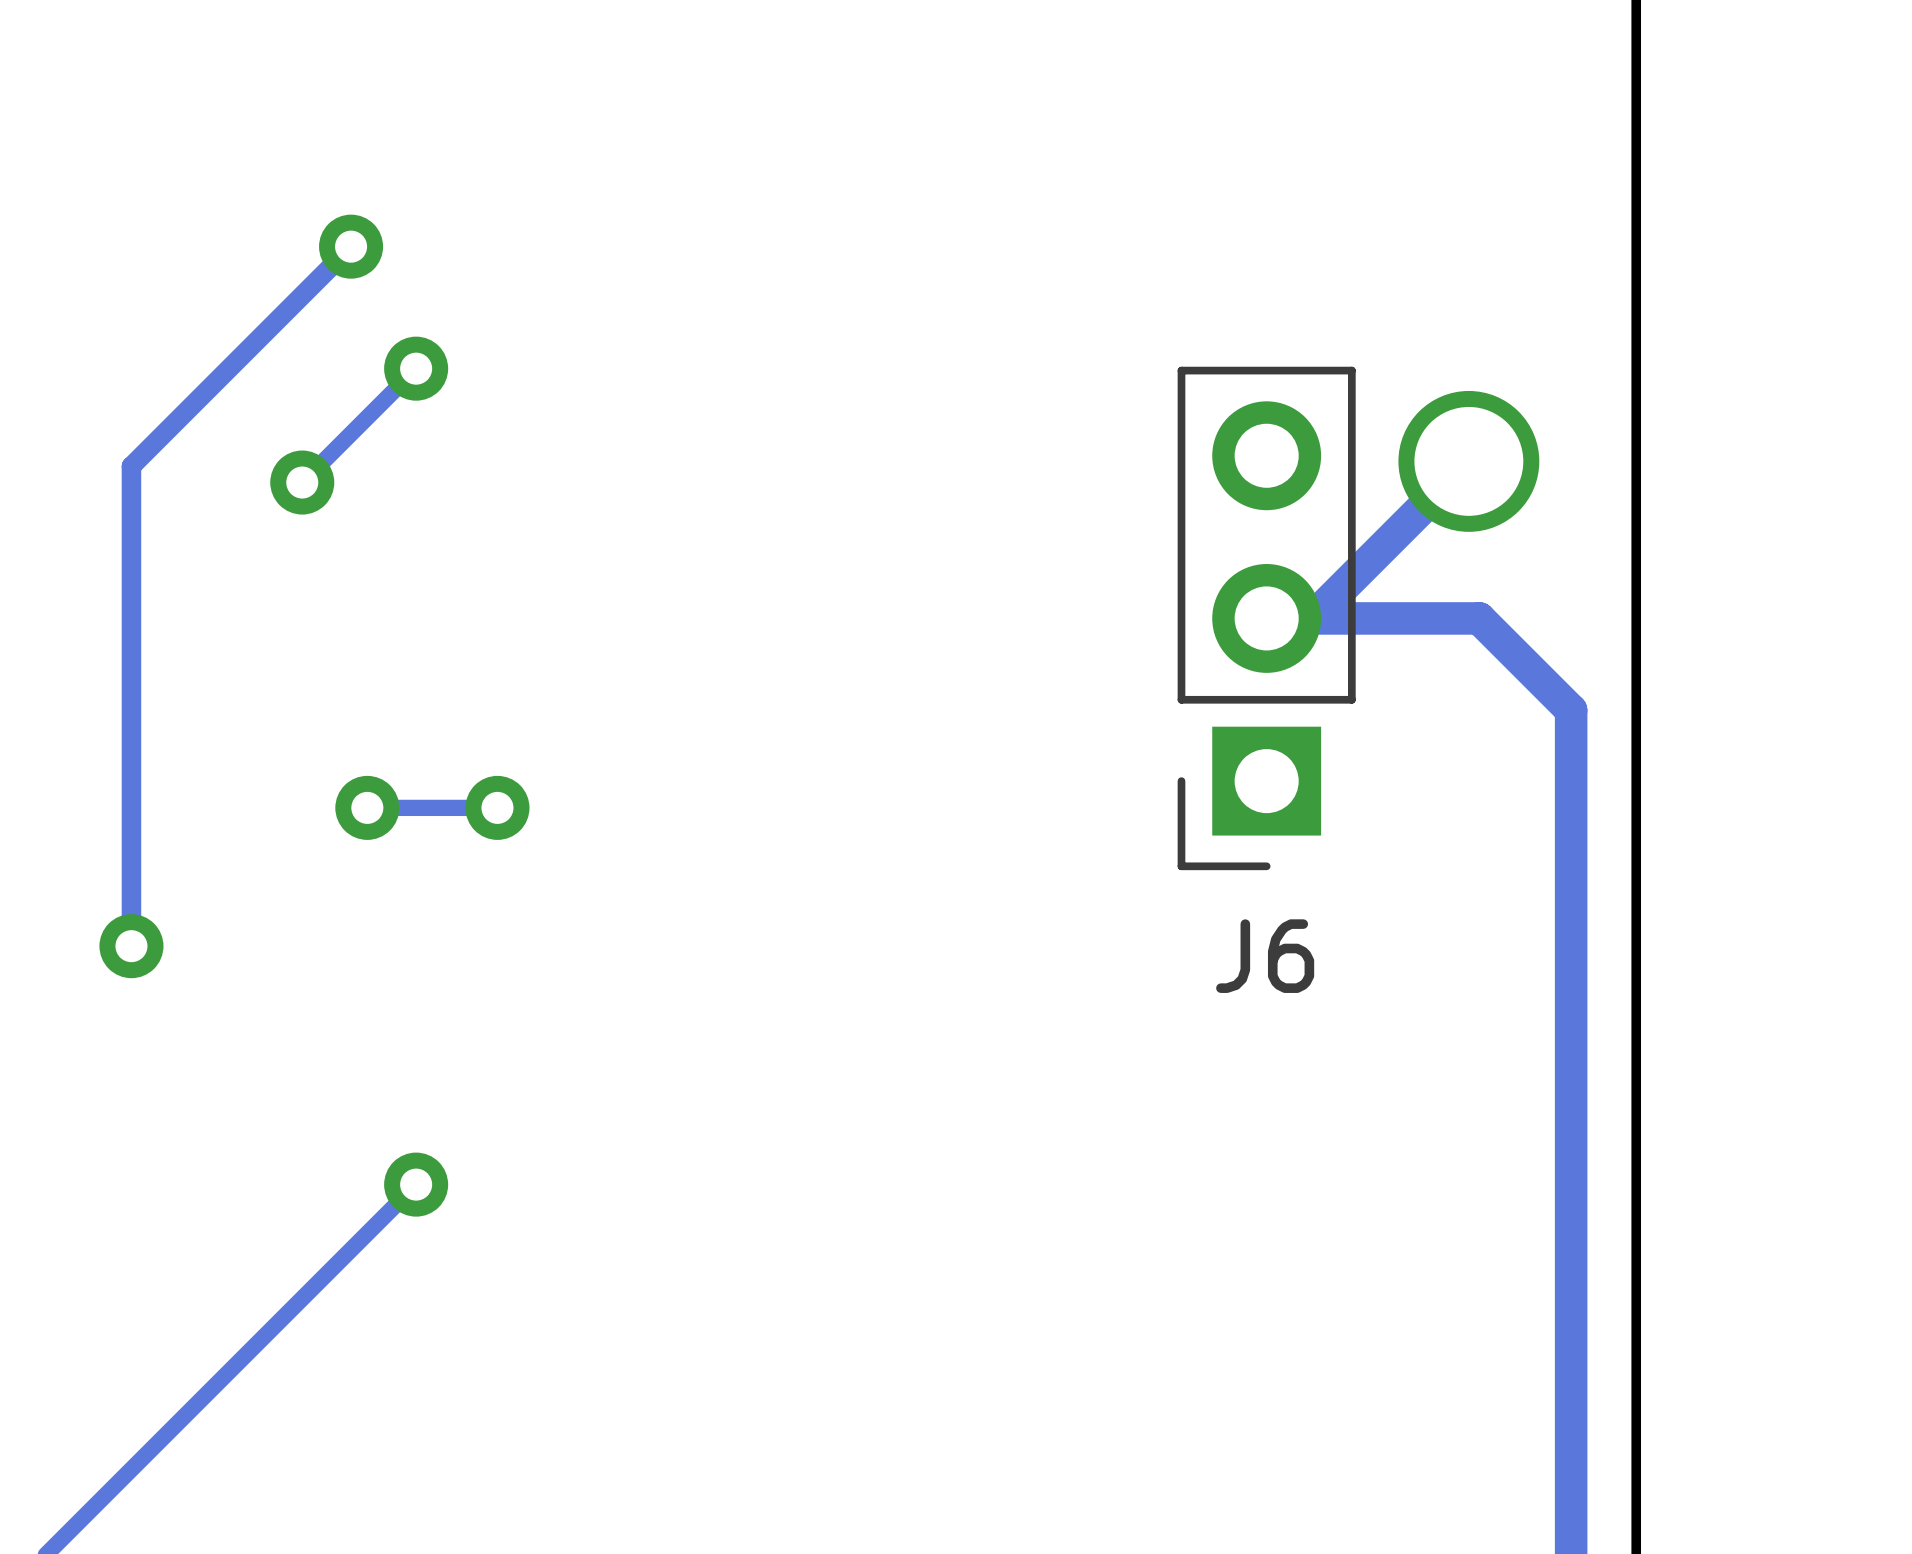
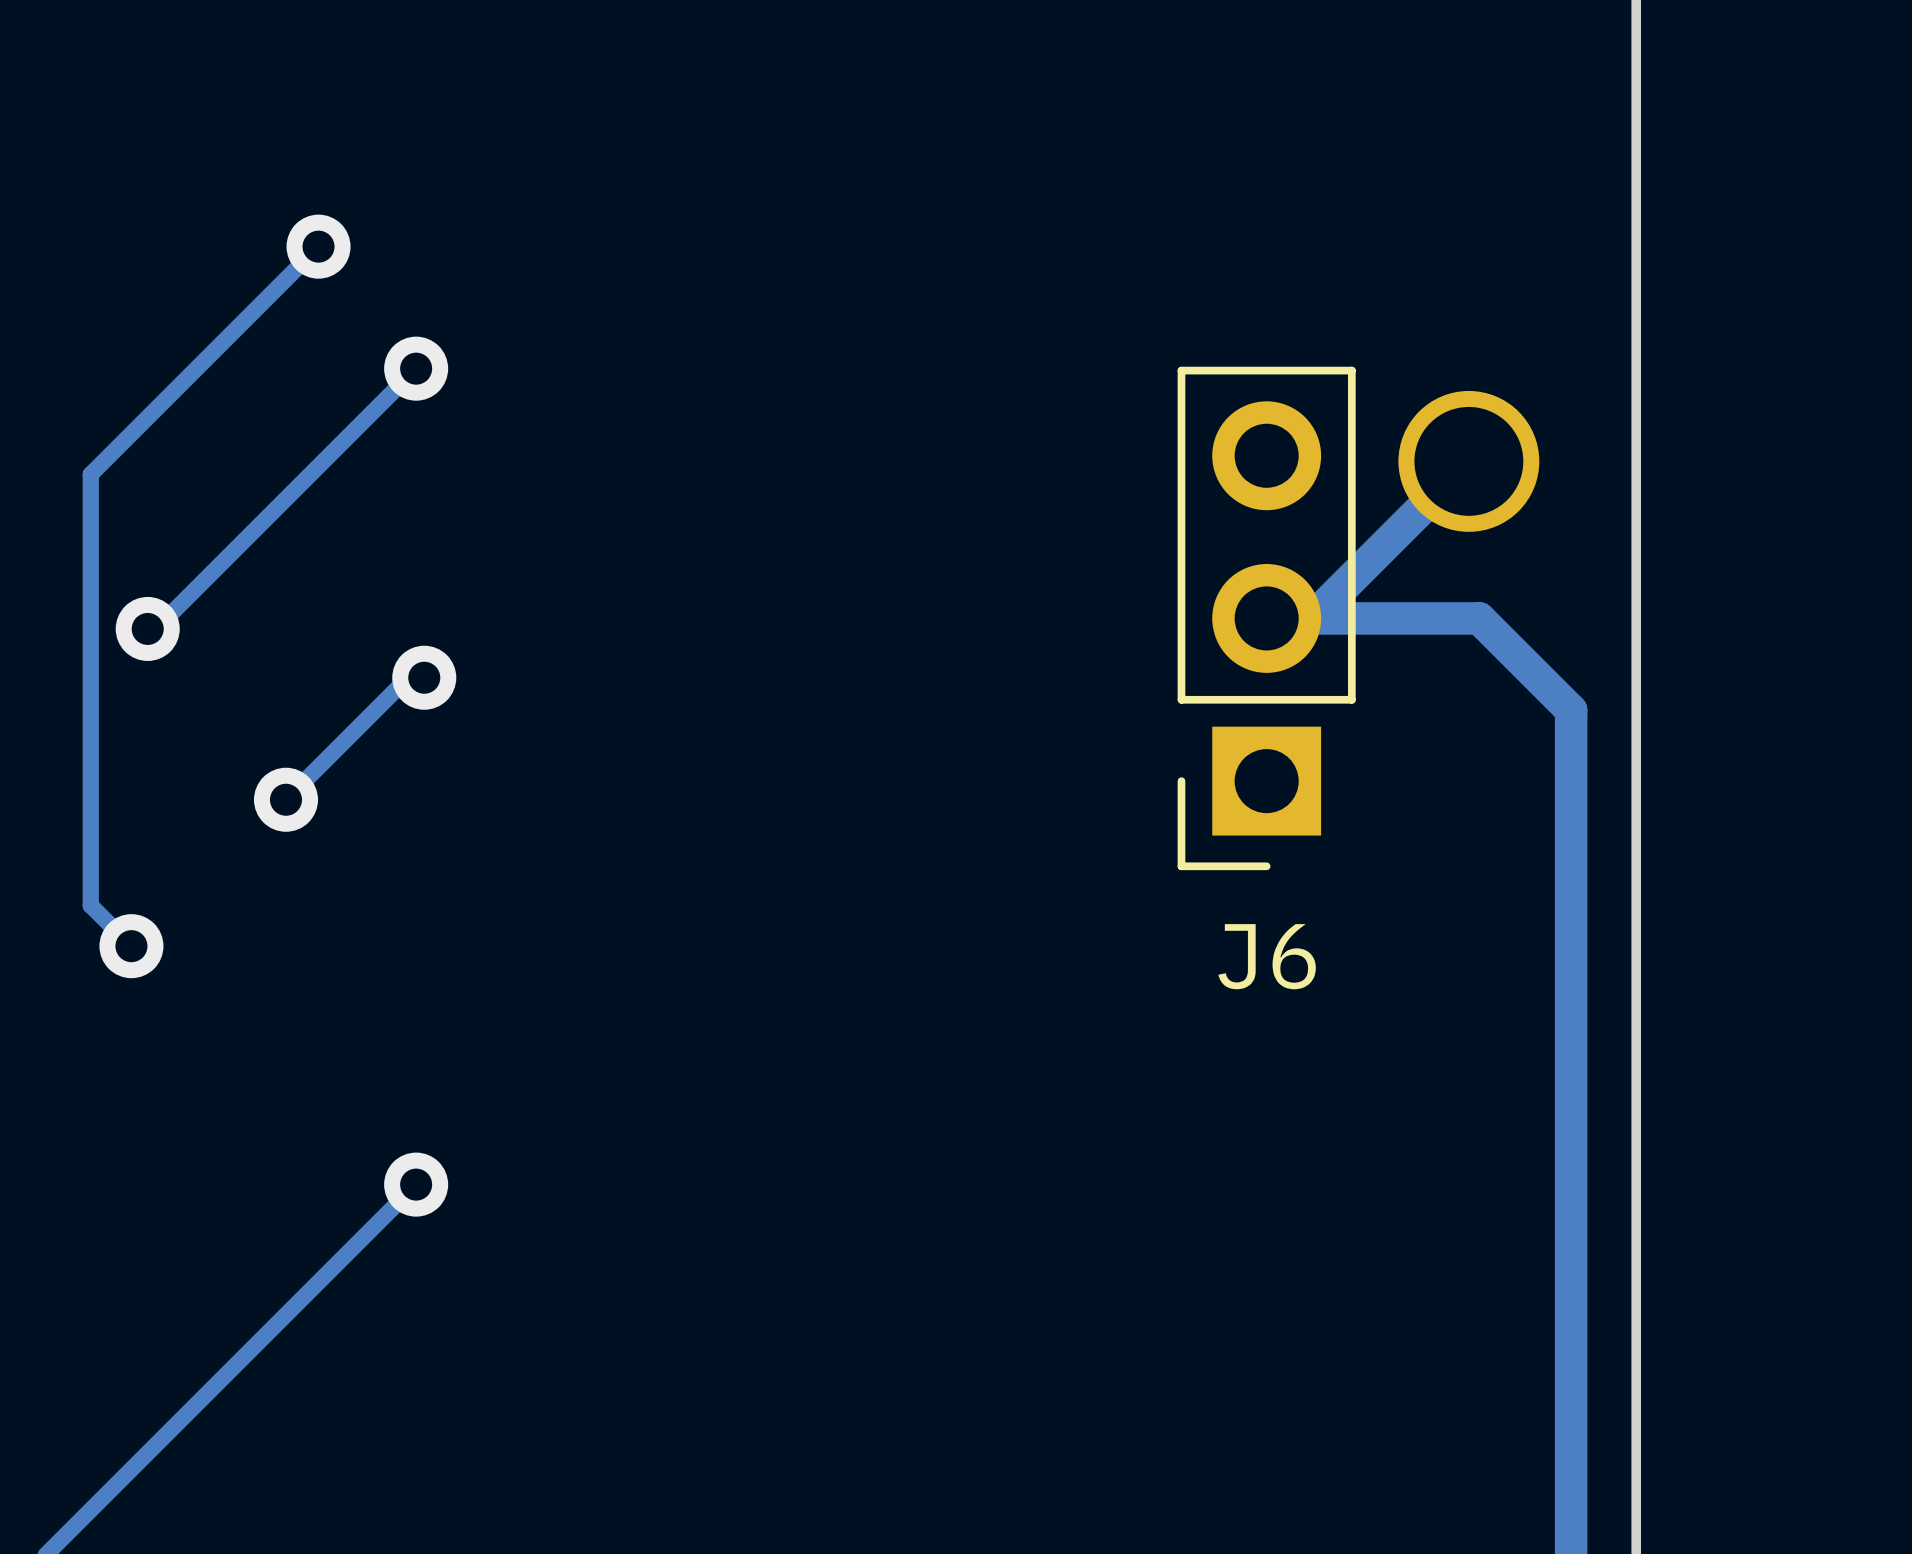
track: (351, 246) (131, 466) (131, 946) -> (318, 246) (90, 474) (90, 905) (131, 946)
via position: (351, 246) -> (318, 246)
track: none -> (302, 482) (155, 628) (147, 628)
via: (302, 482) -> none
via: none -> (147, 628)
track: none -> (424, 677) (408, 677) (285, 799)
via: none -> (424, 677)
via: none -> (285, 799)
via: (367, 807) -> none
track: (497, 807) (367, 807) -> none
via: (497, 807) -> none

